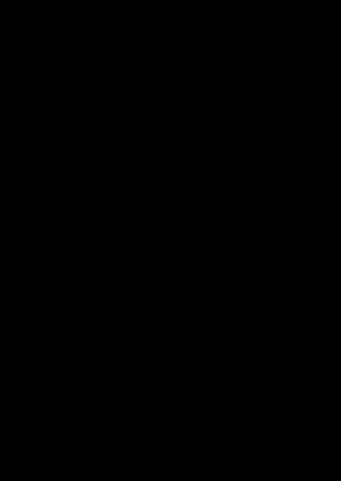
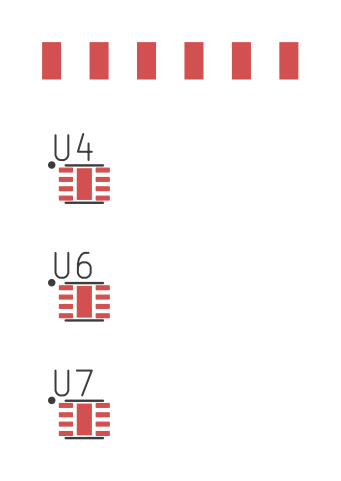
part: none -> (170, 60)
U4: none -> (78, 182)
U6: none -> (78, 300)
U7: none -> (78, 417)

